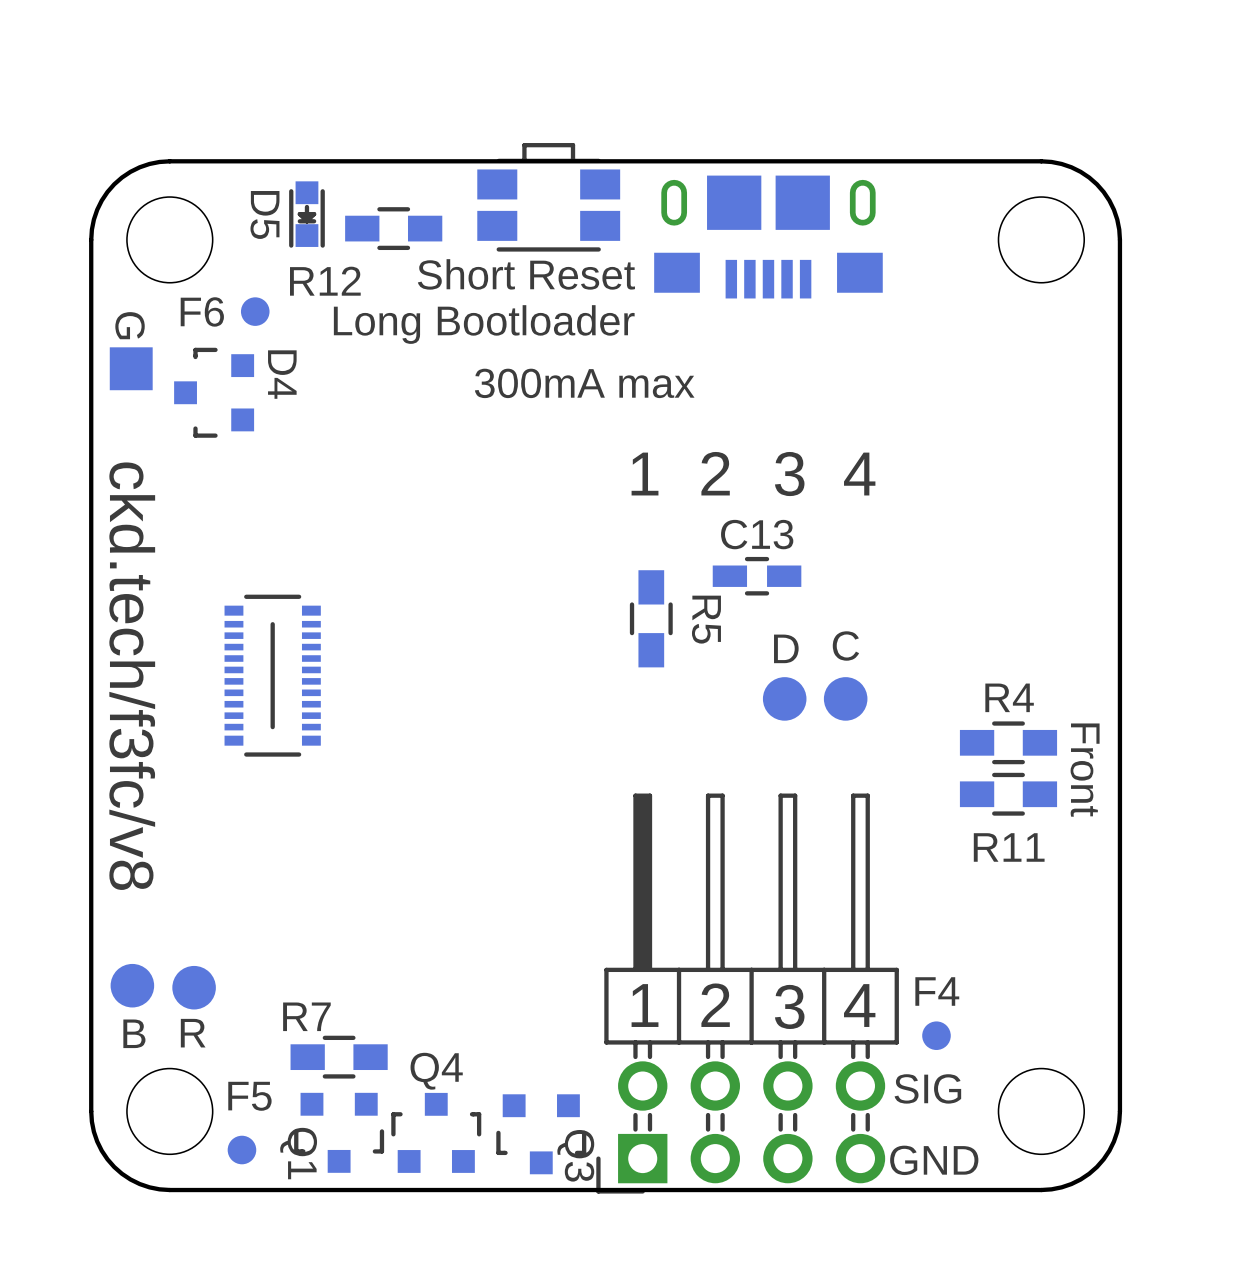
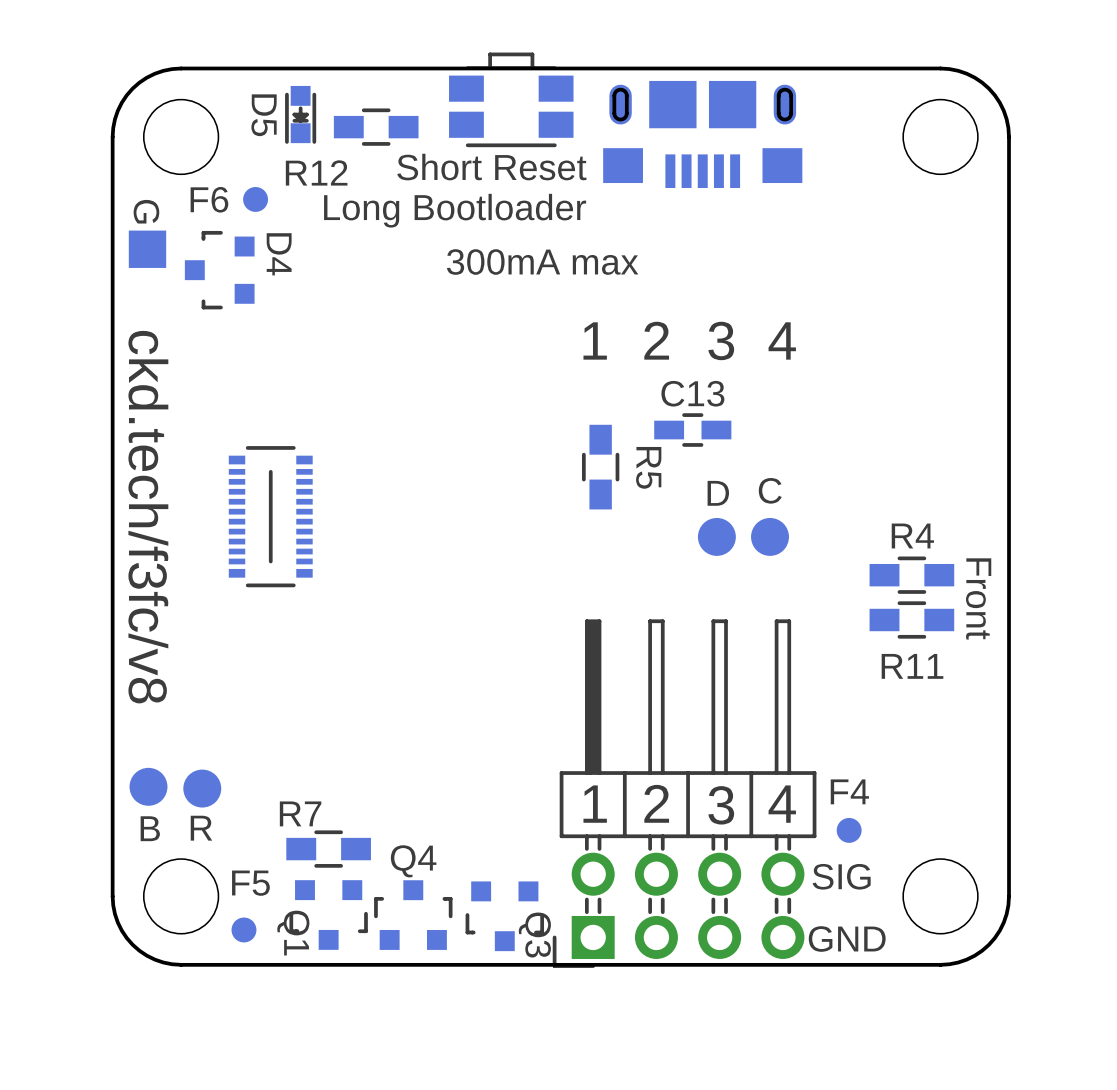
part footprint: [654, 175, 883, 299] -> [603, 80, 803, 189]
board edge: none -> (626, 95) (626, 115) (622, 119) (618, 119) (614, 114) (614, 93) (618, 90) (622, 89) (626, 95)
board edge: none -> (791, 95) (790, 115) (787, 119) (782, 119) (778, 114) (779, 93) (782, 90) (786, 89) (791, 95)

